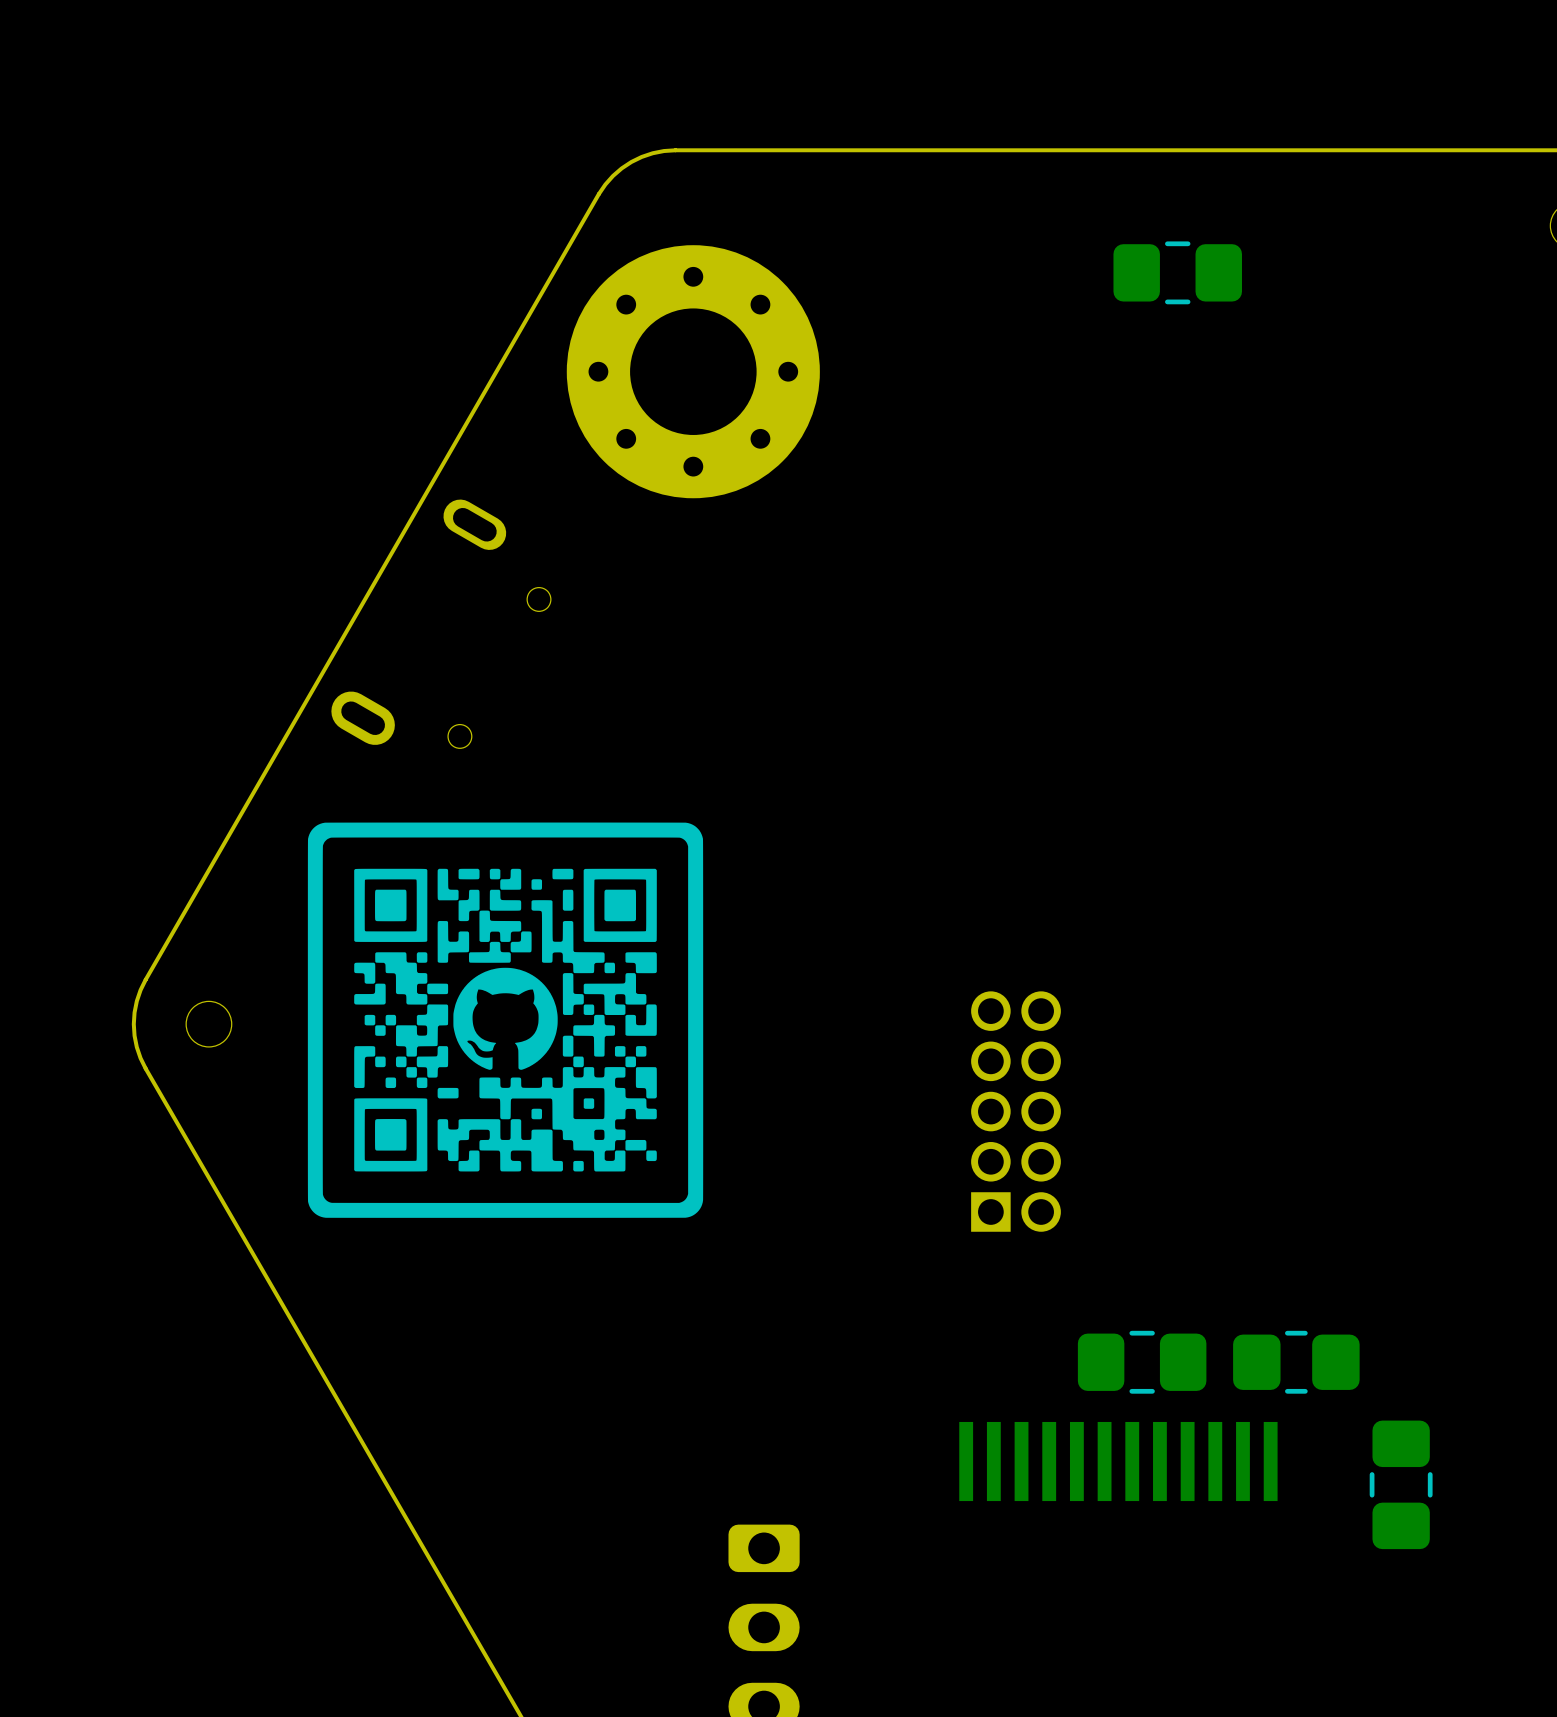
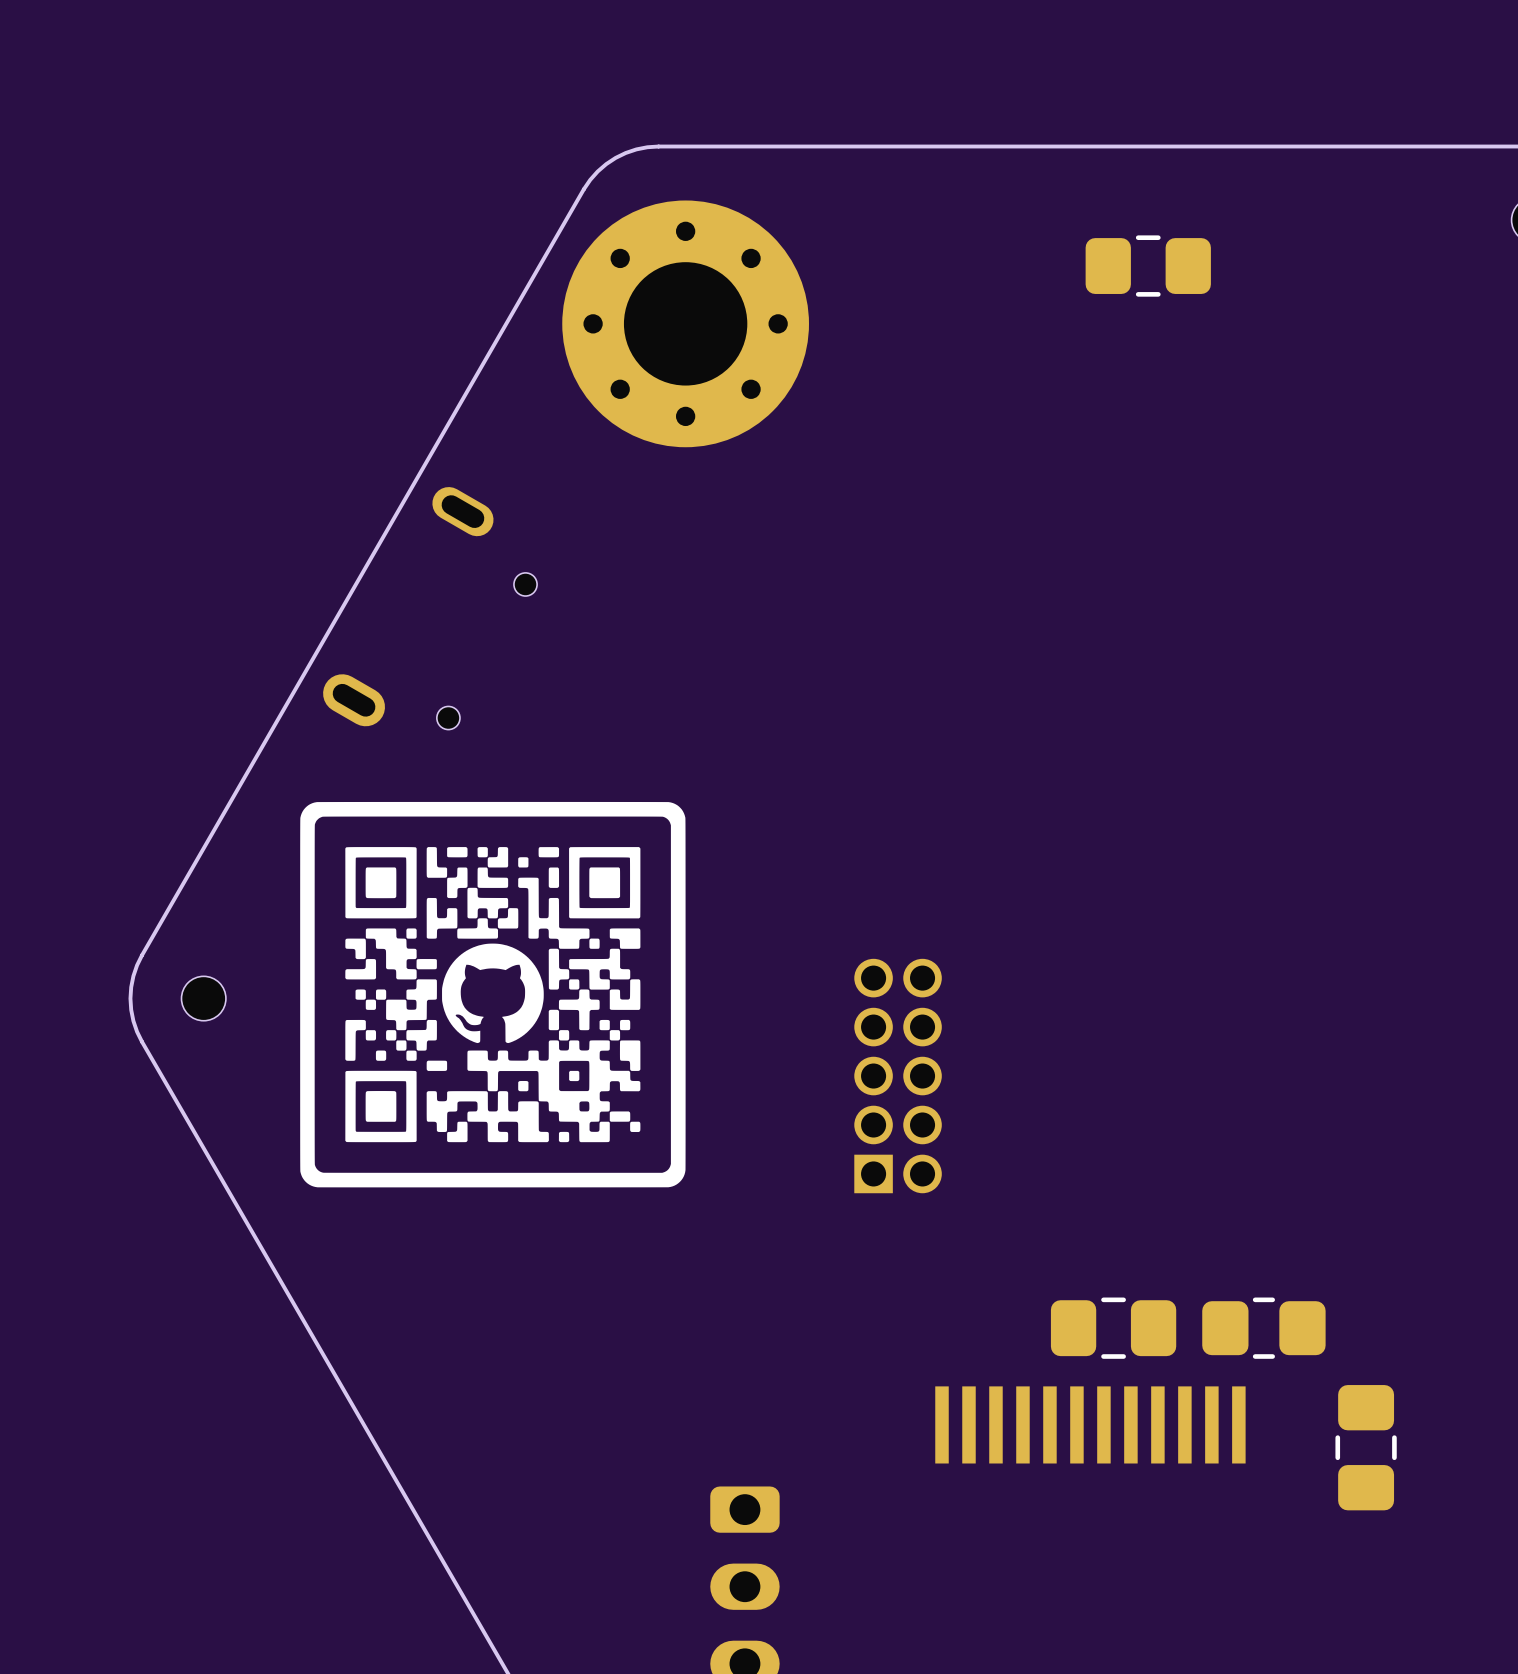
part position: (693, 371) -> (685, 323)
part position: (1016, 1111) -> (898, 1076)

